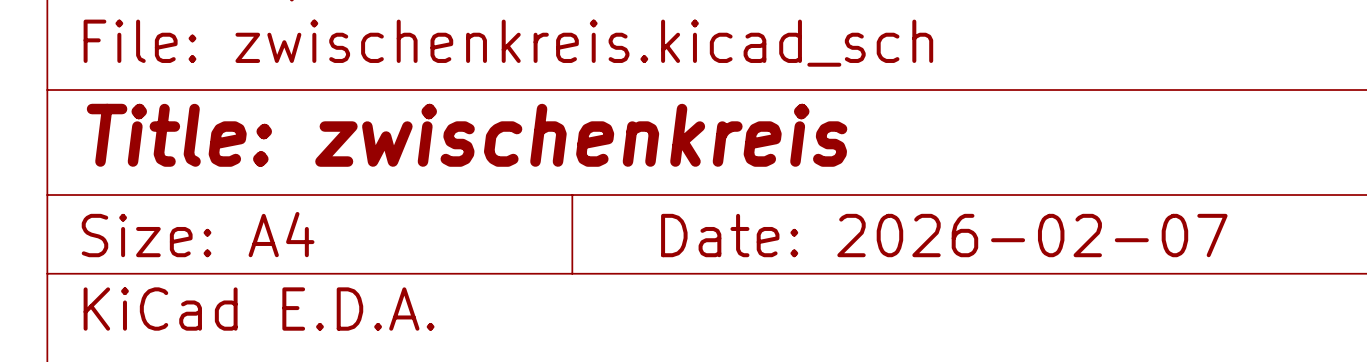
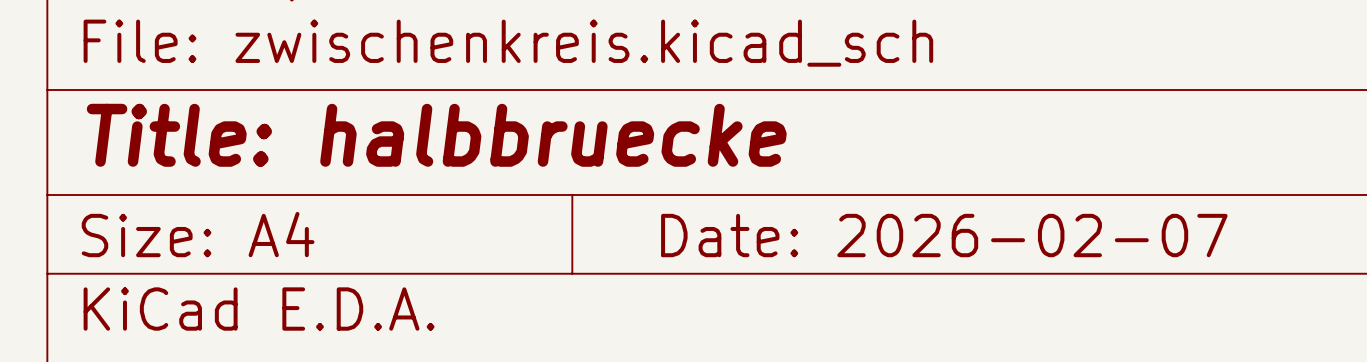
title block: Title: zwischenkreis (467, 135) -> Title: halbbruecke (436, 135)

